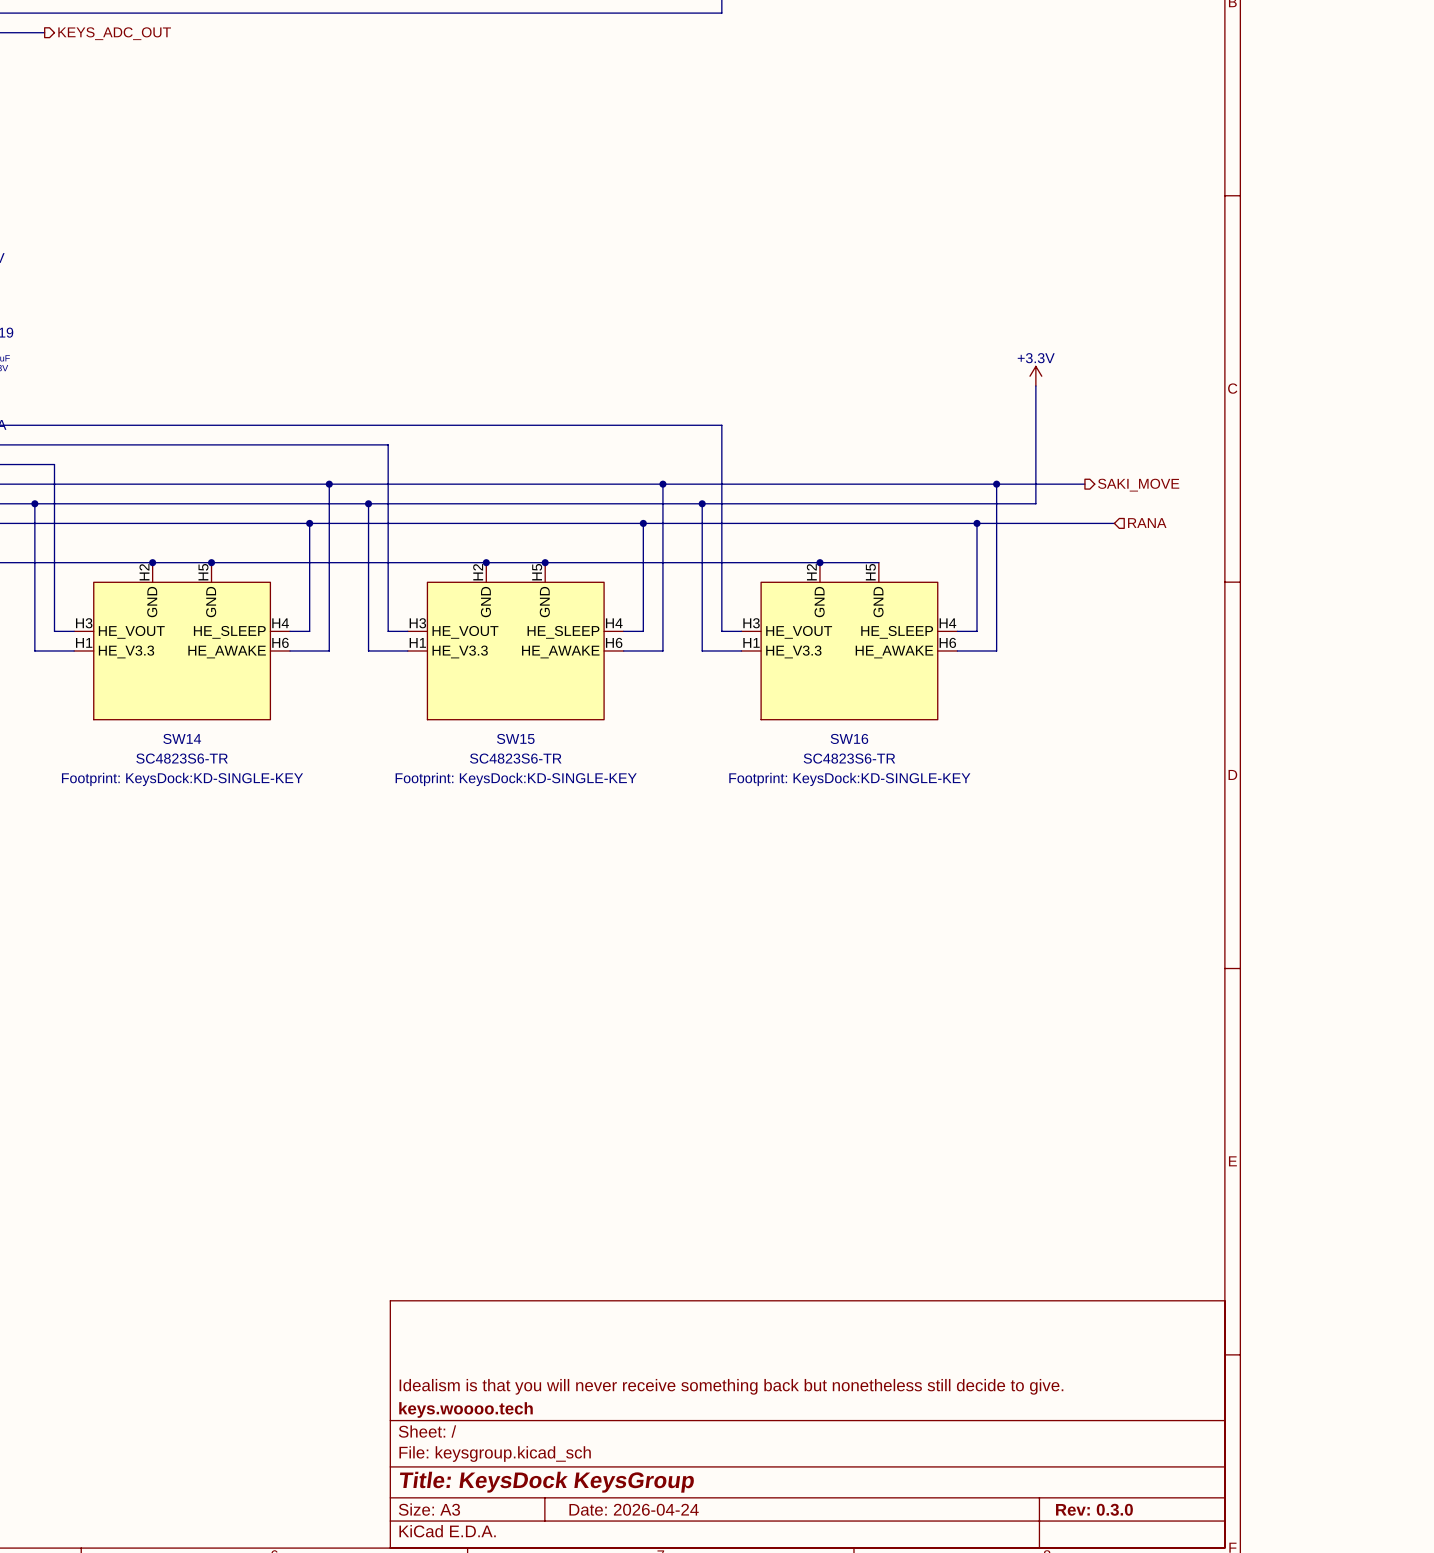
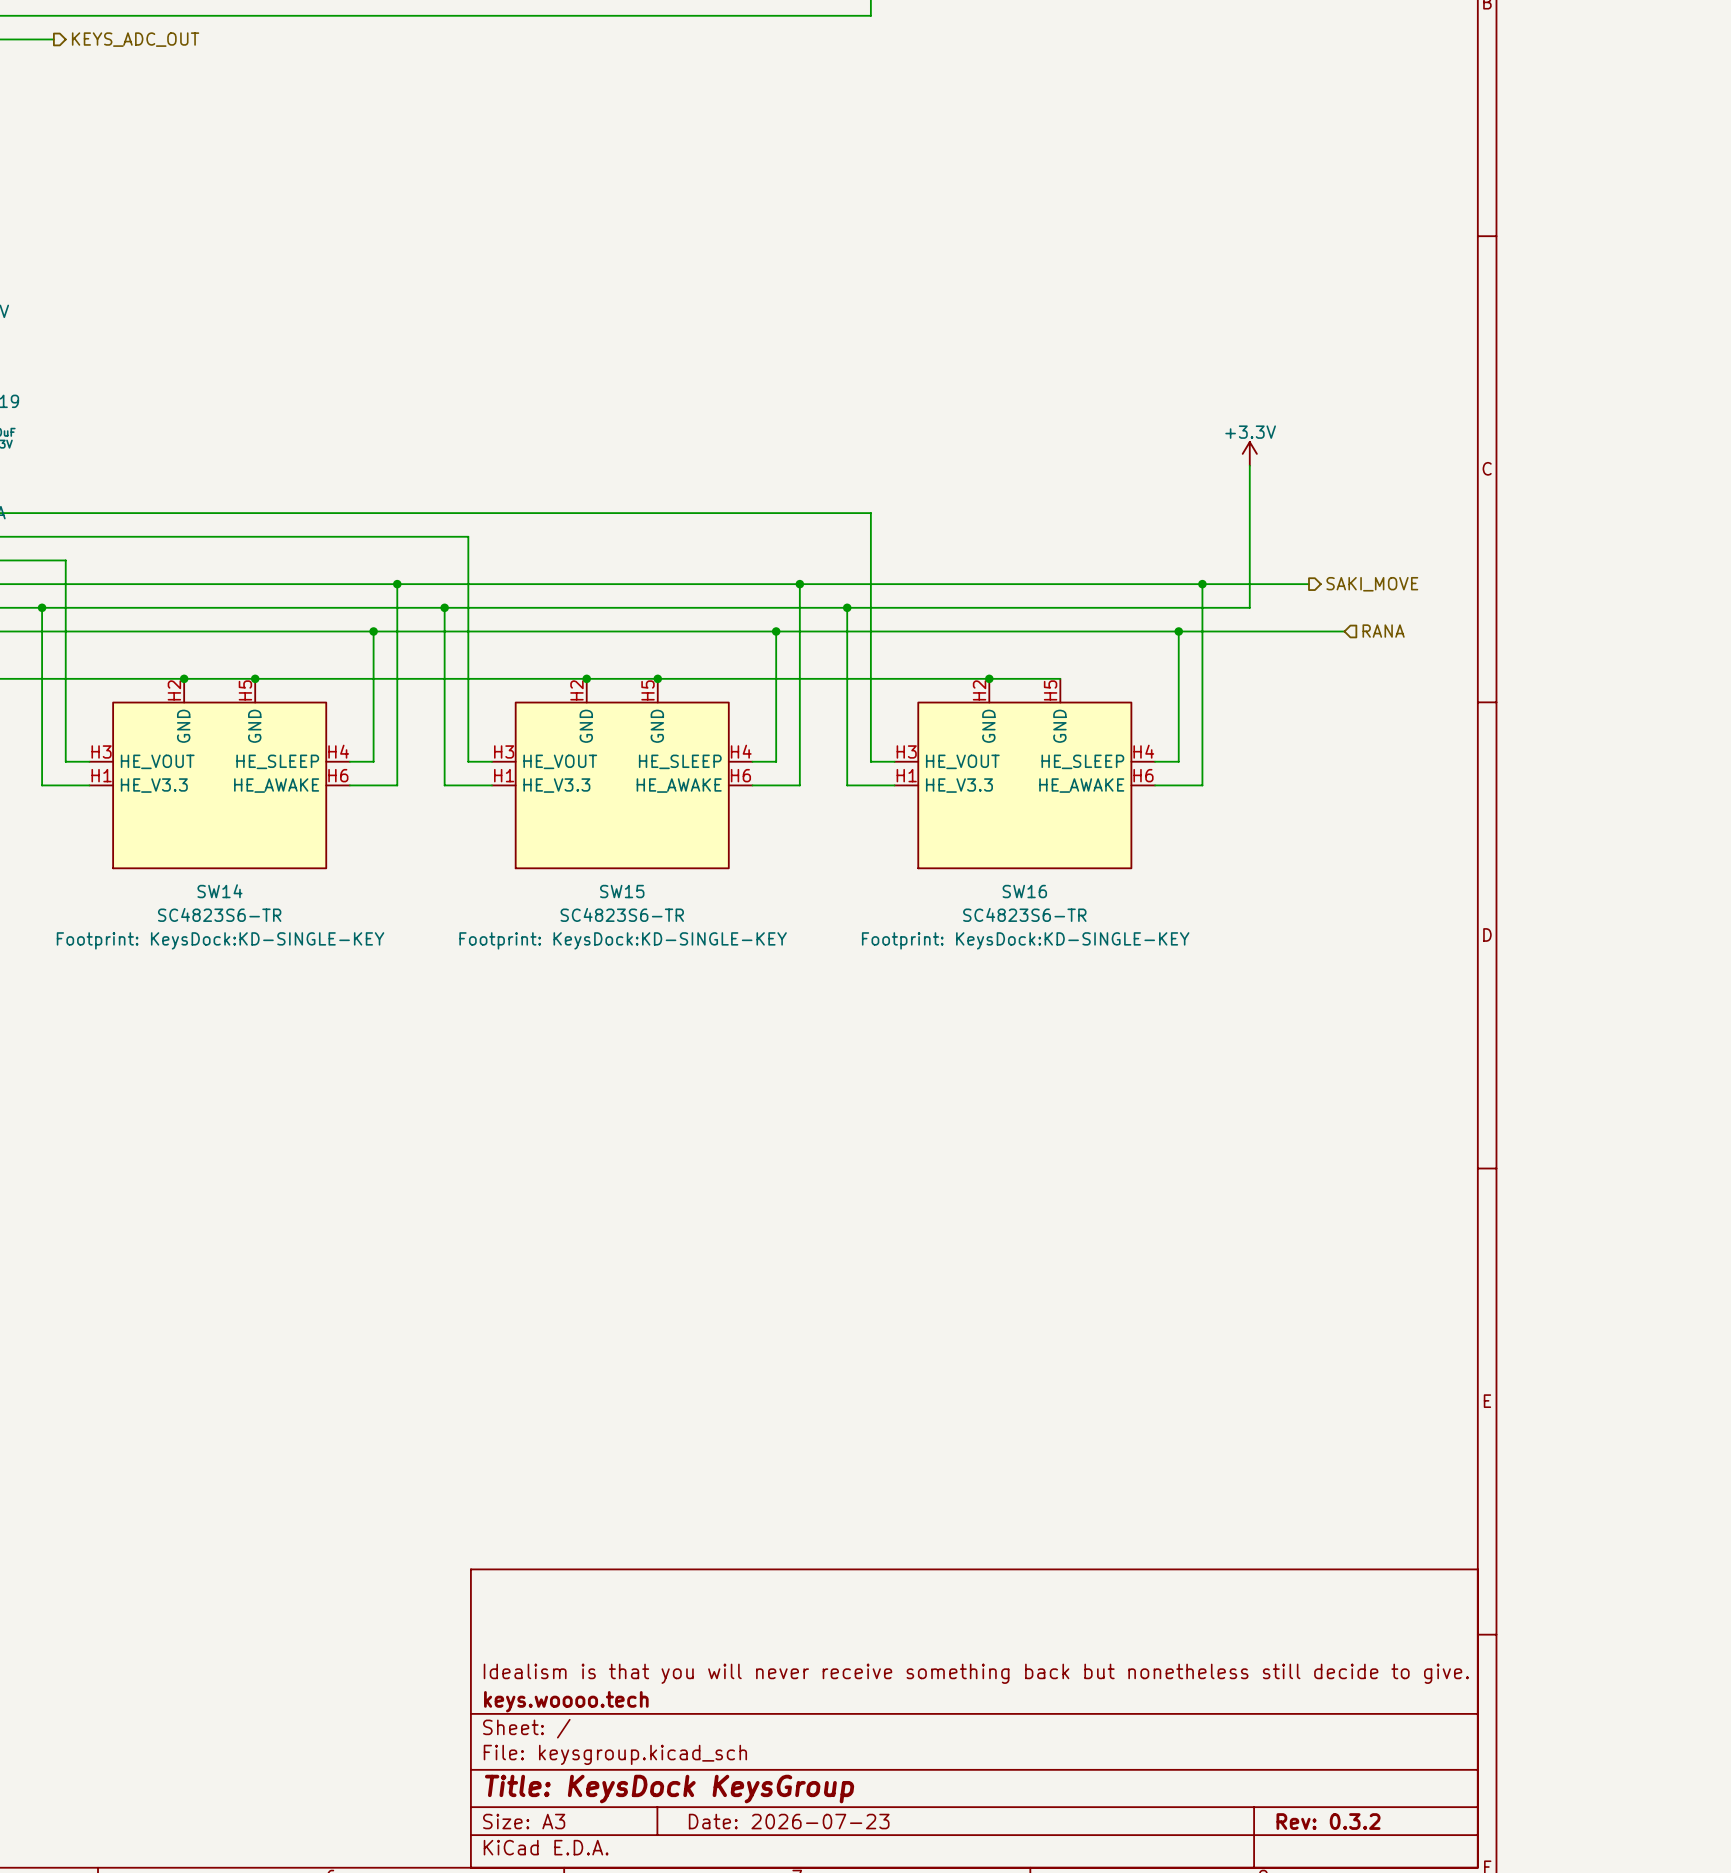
title block: Date: 2026-04-24 (634, 1509) -> Date: 2026-07-23 (789, 1821)
title block: Rev: 0.3.0 (1094, 1509) -> Rev: 0.3.2 (1328, 1821)

